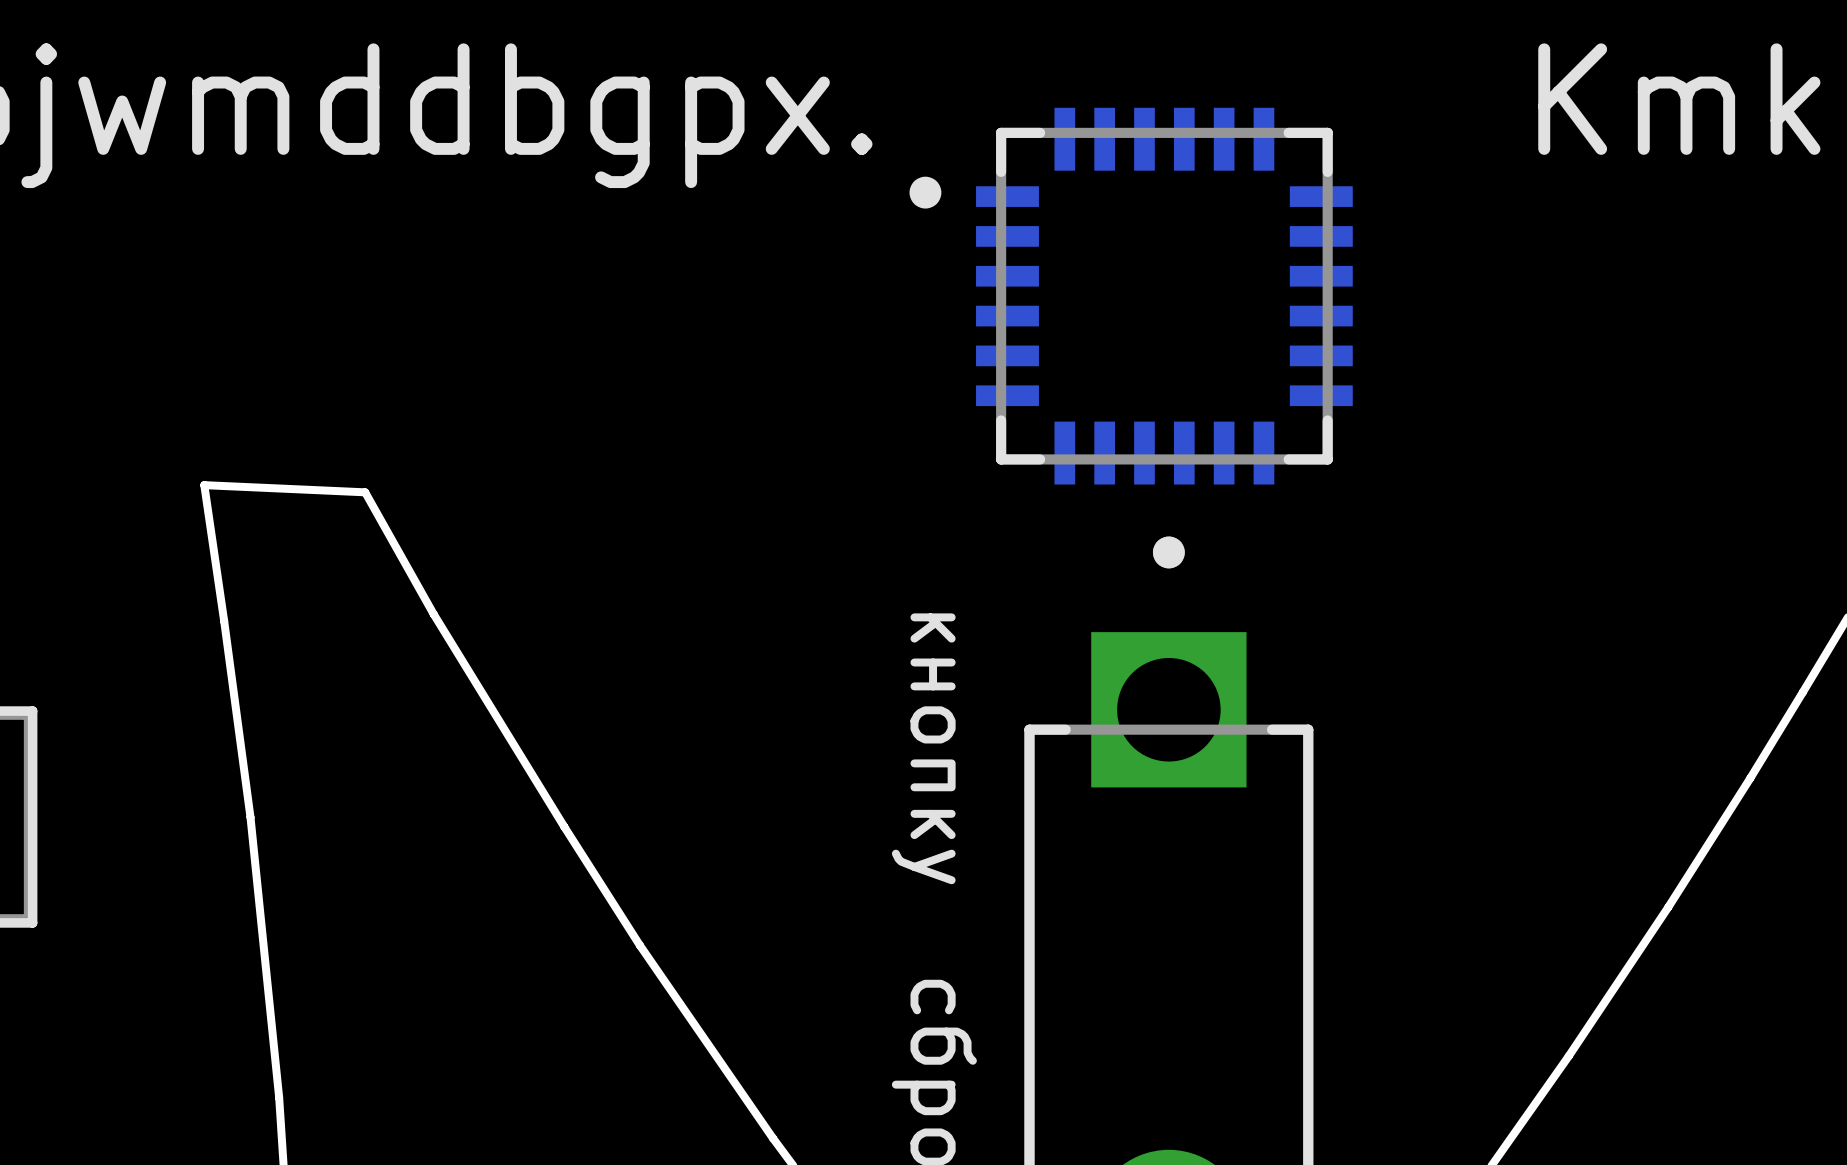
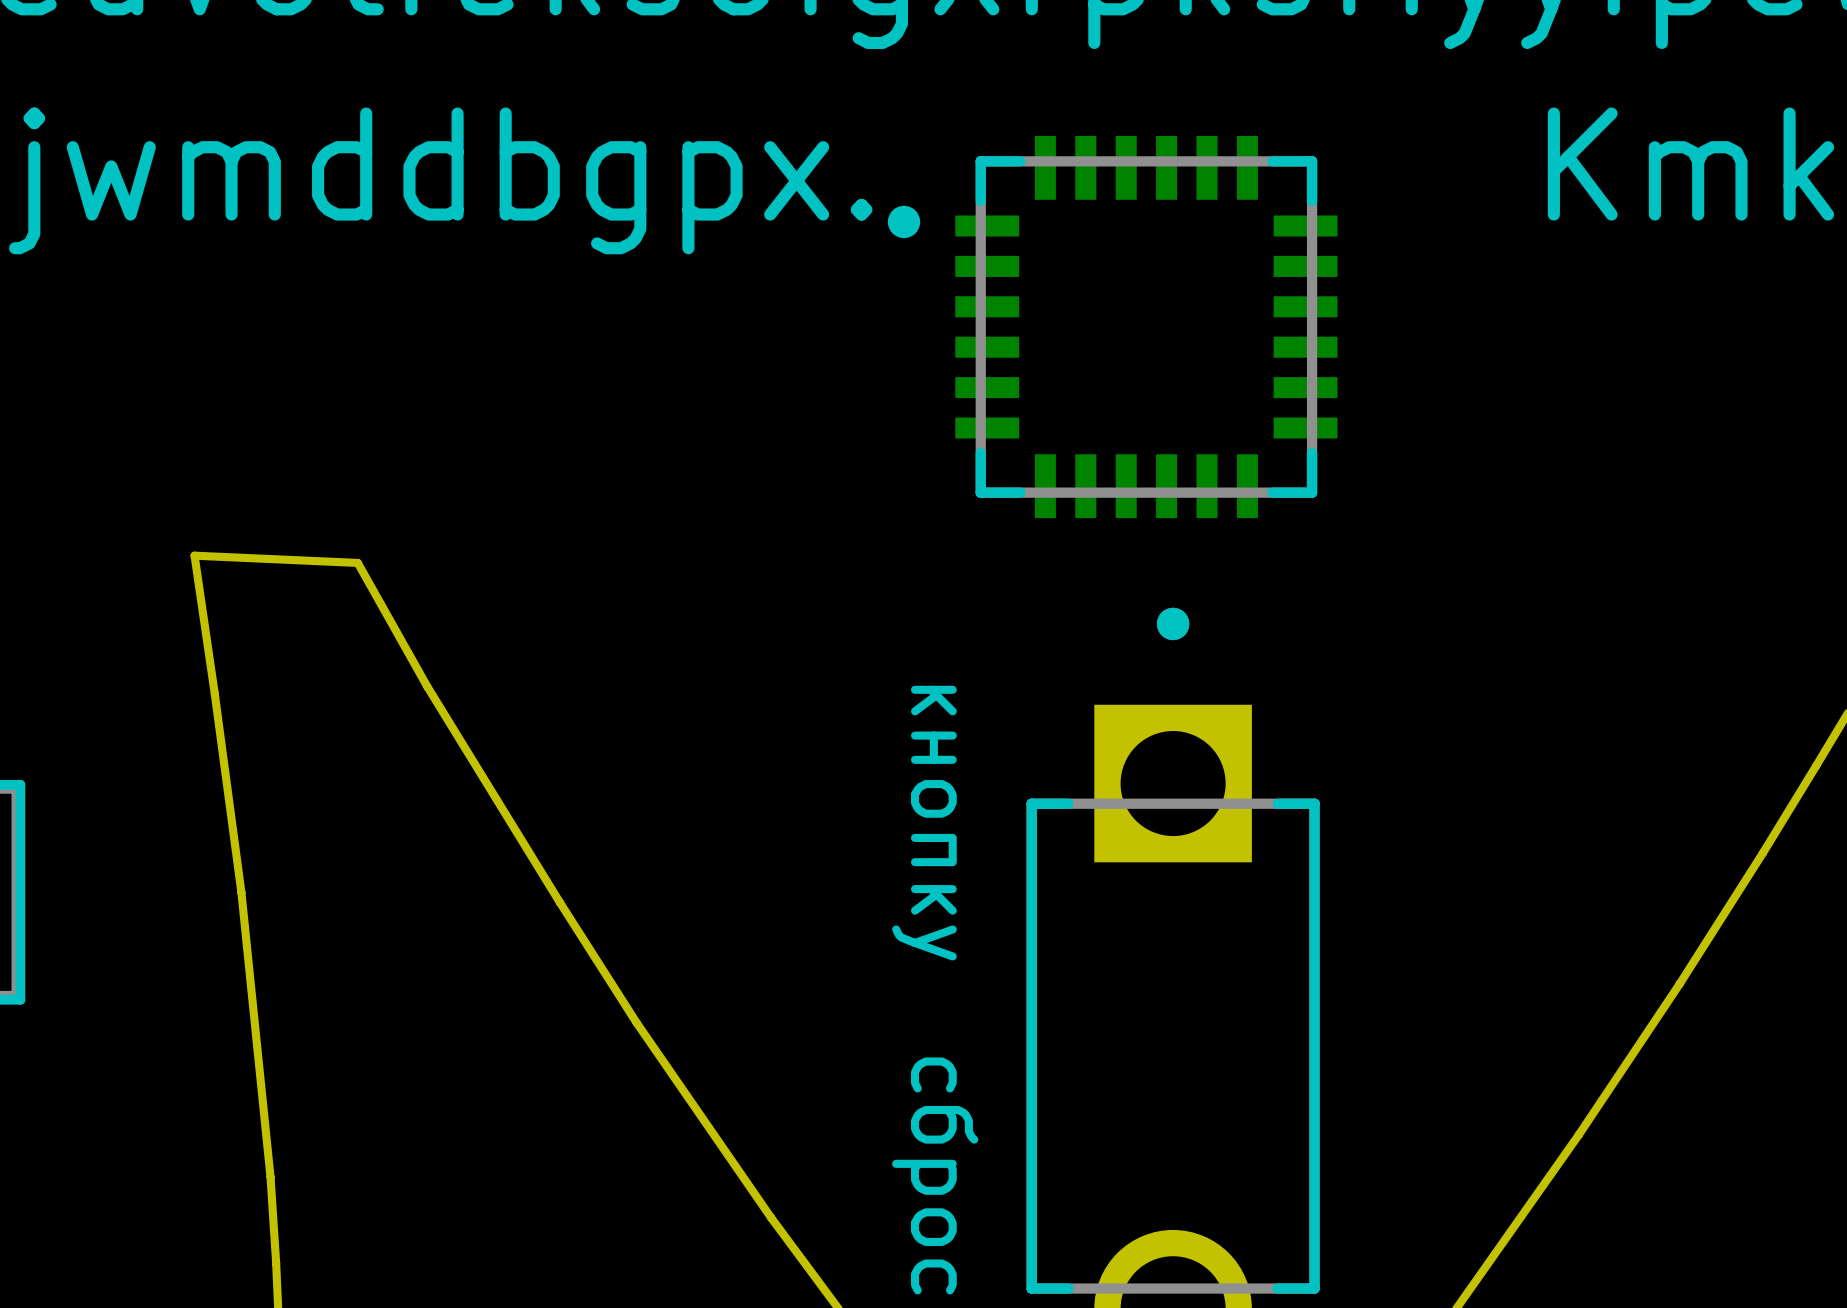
part position: (1131, 296) -> (1112, 327)

